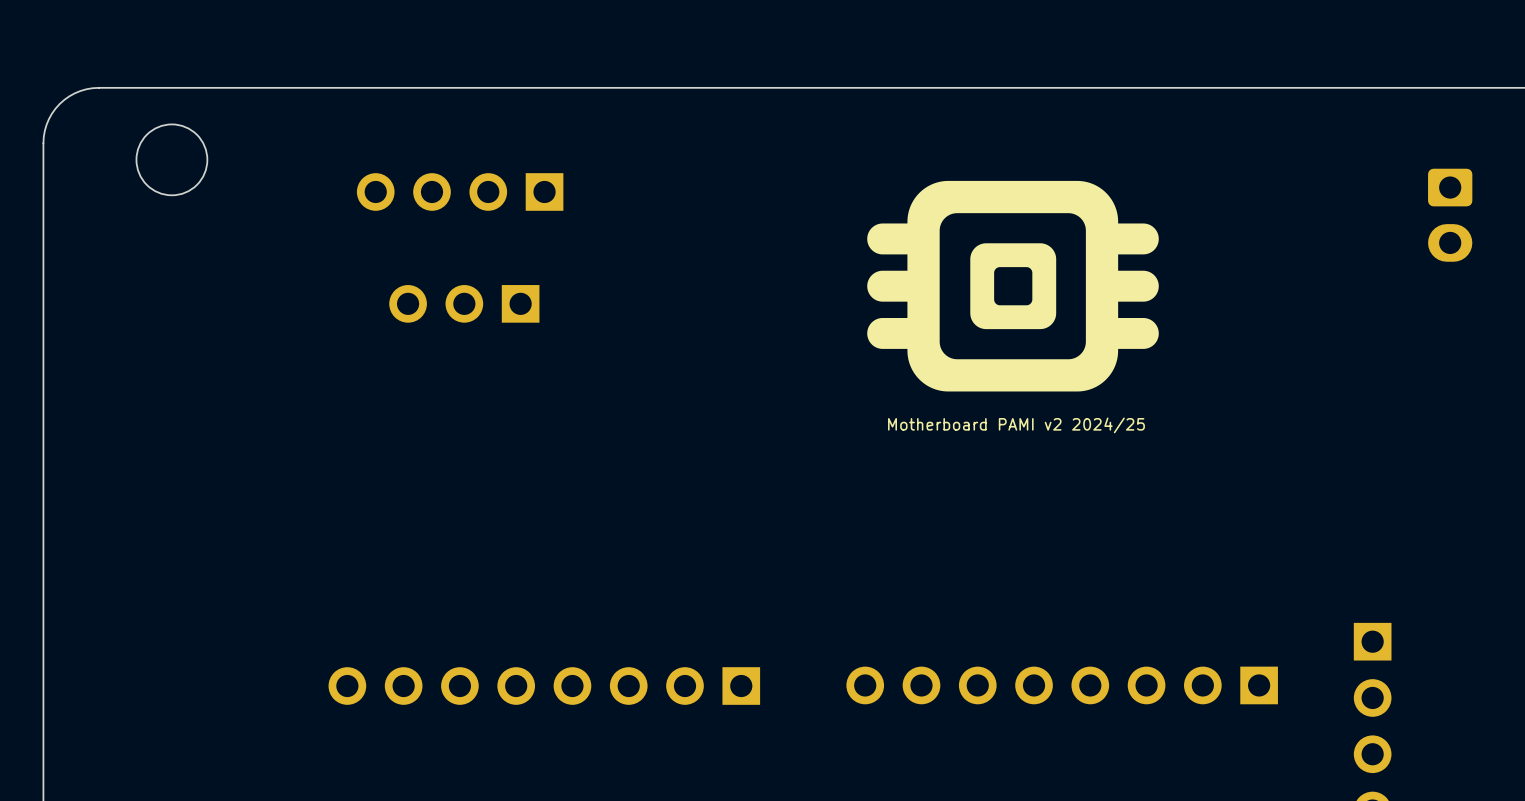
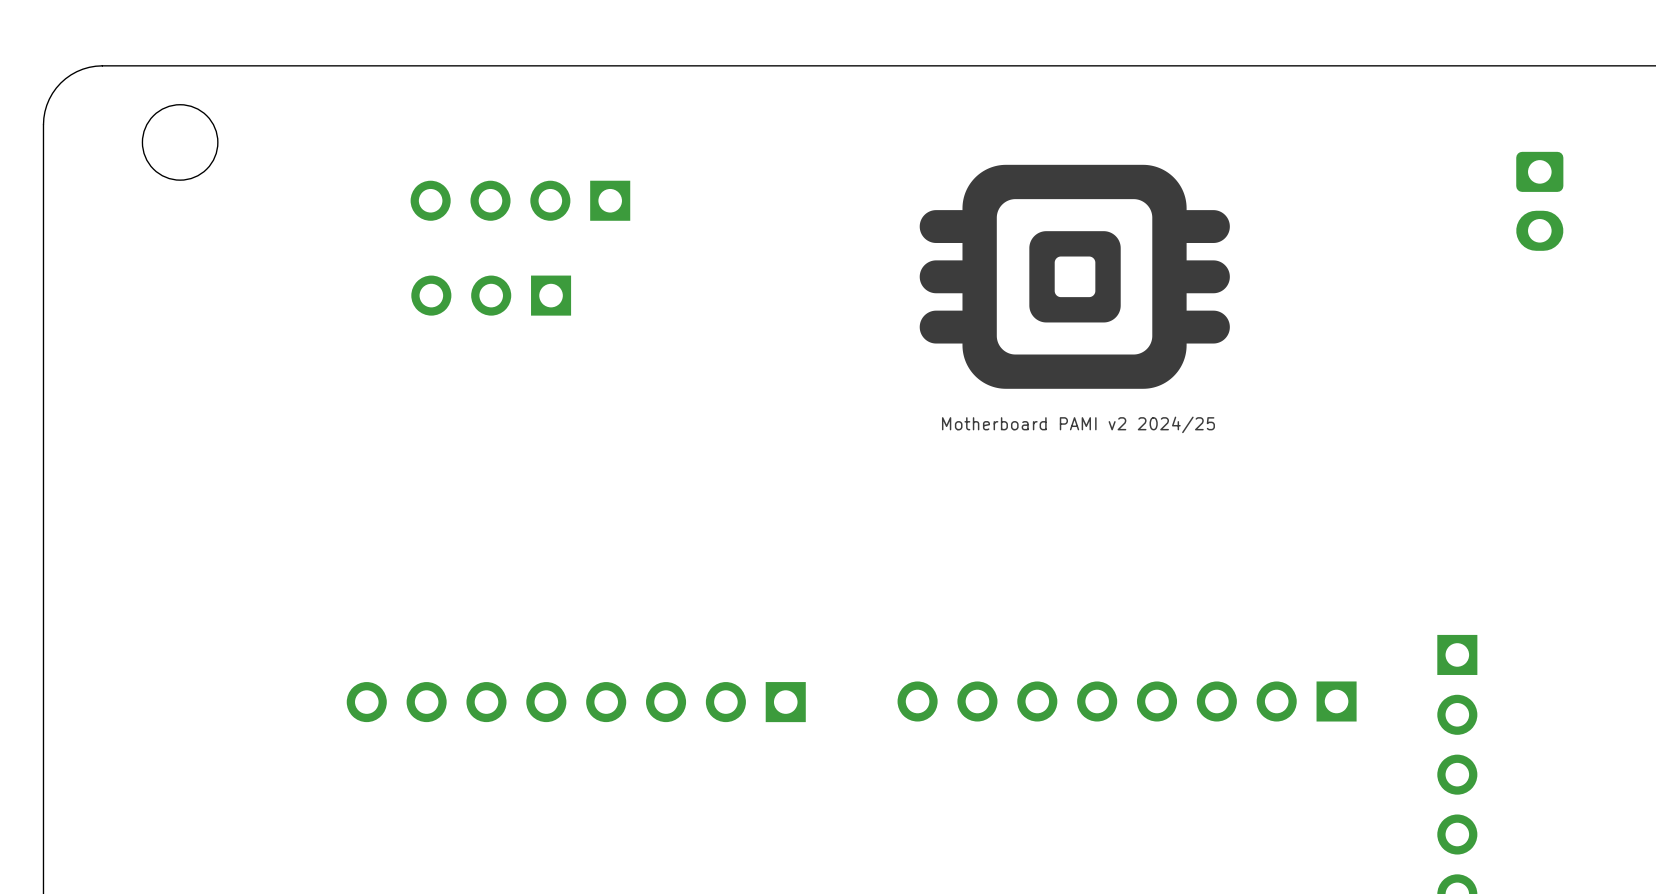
part position: (460, 191) -> (520, 200)

